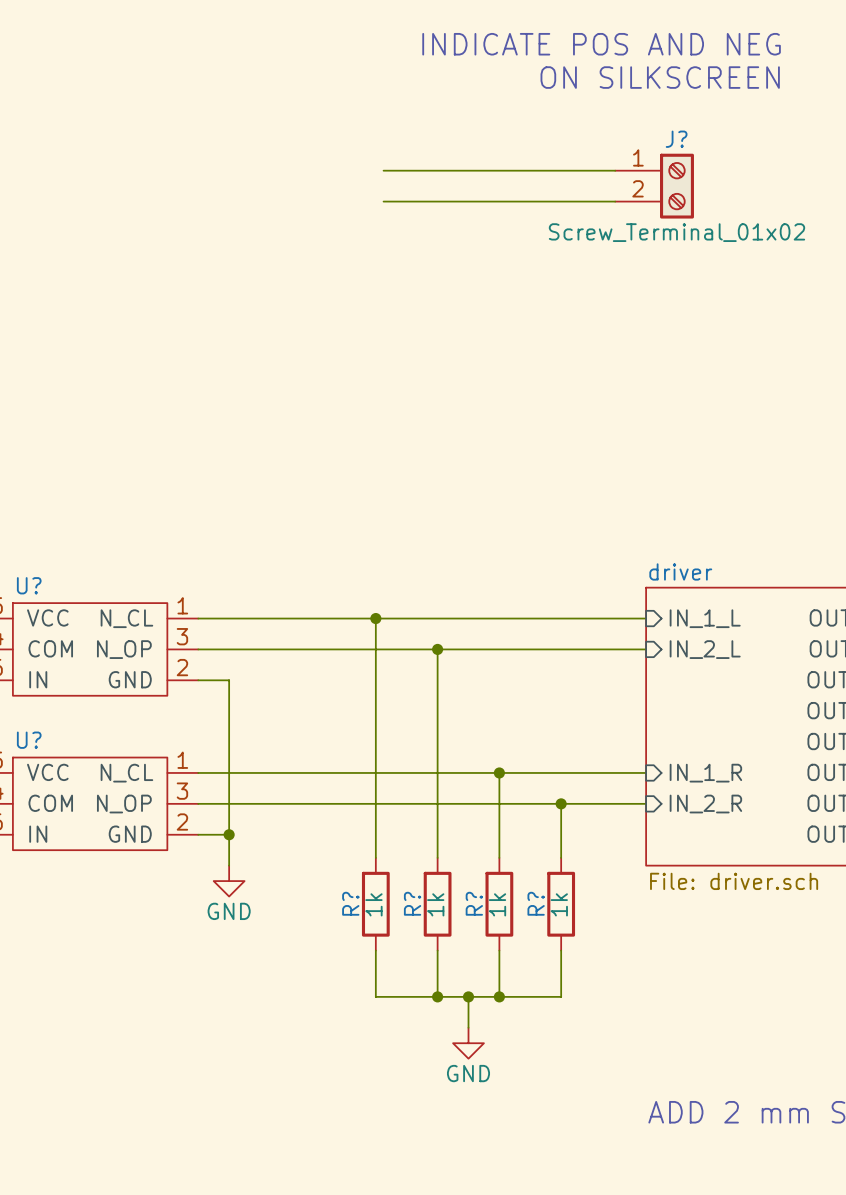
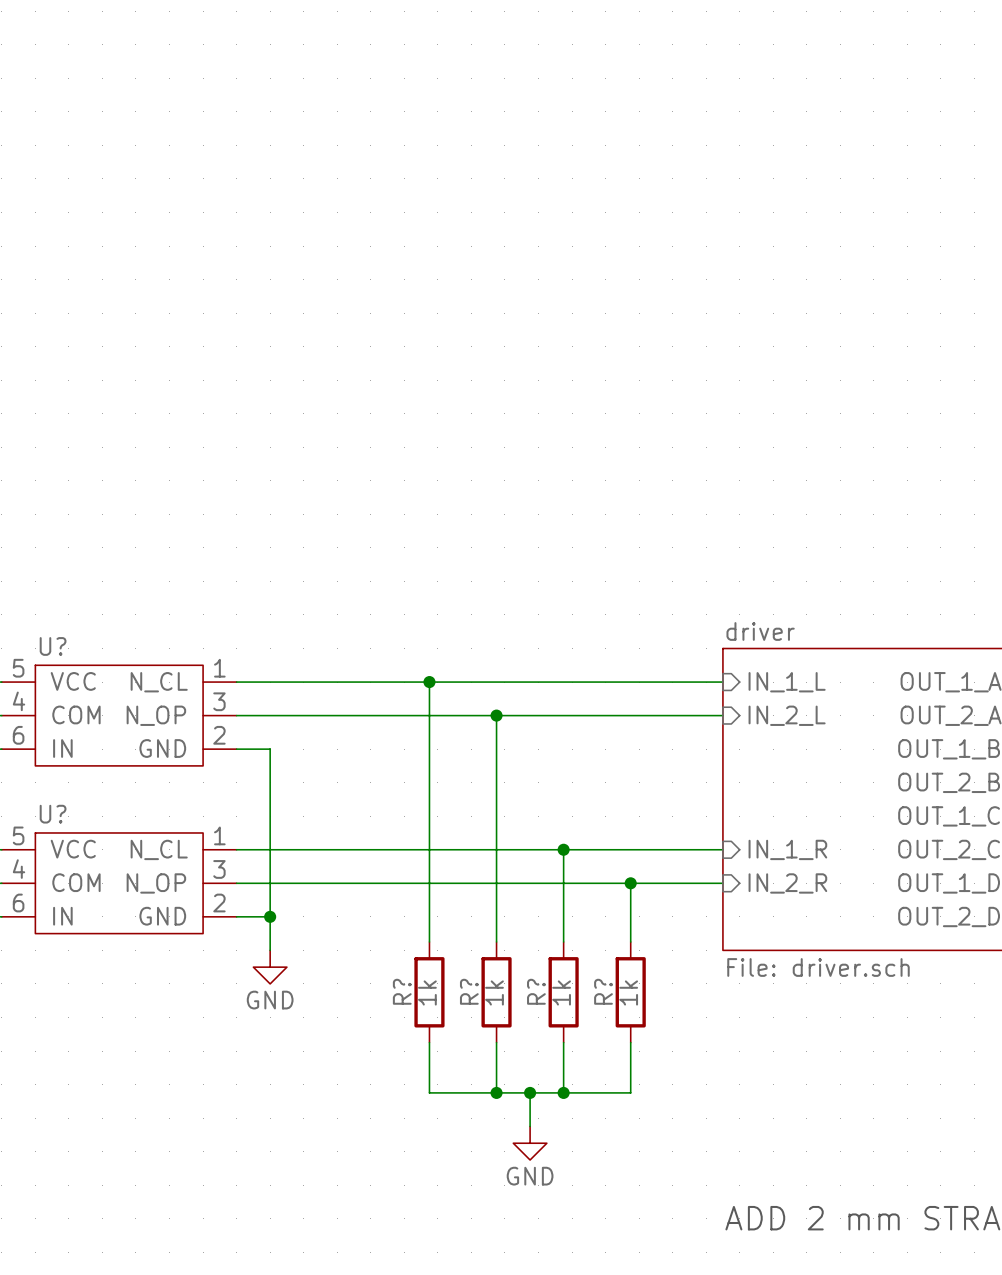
text: INDICATE POS AND NEG (601, 44) -> none
text: ON SILKSCREEN (660, 77) -> none
wire: (383, 170) (615, 170) -> none
J?: Screw_Terminal_01x02 (654, 186) -> none
wire: (383, 201) (615, 201) -> none

